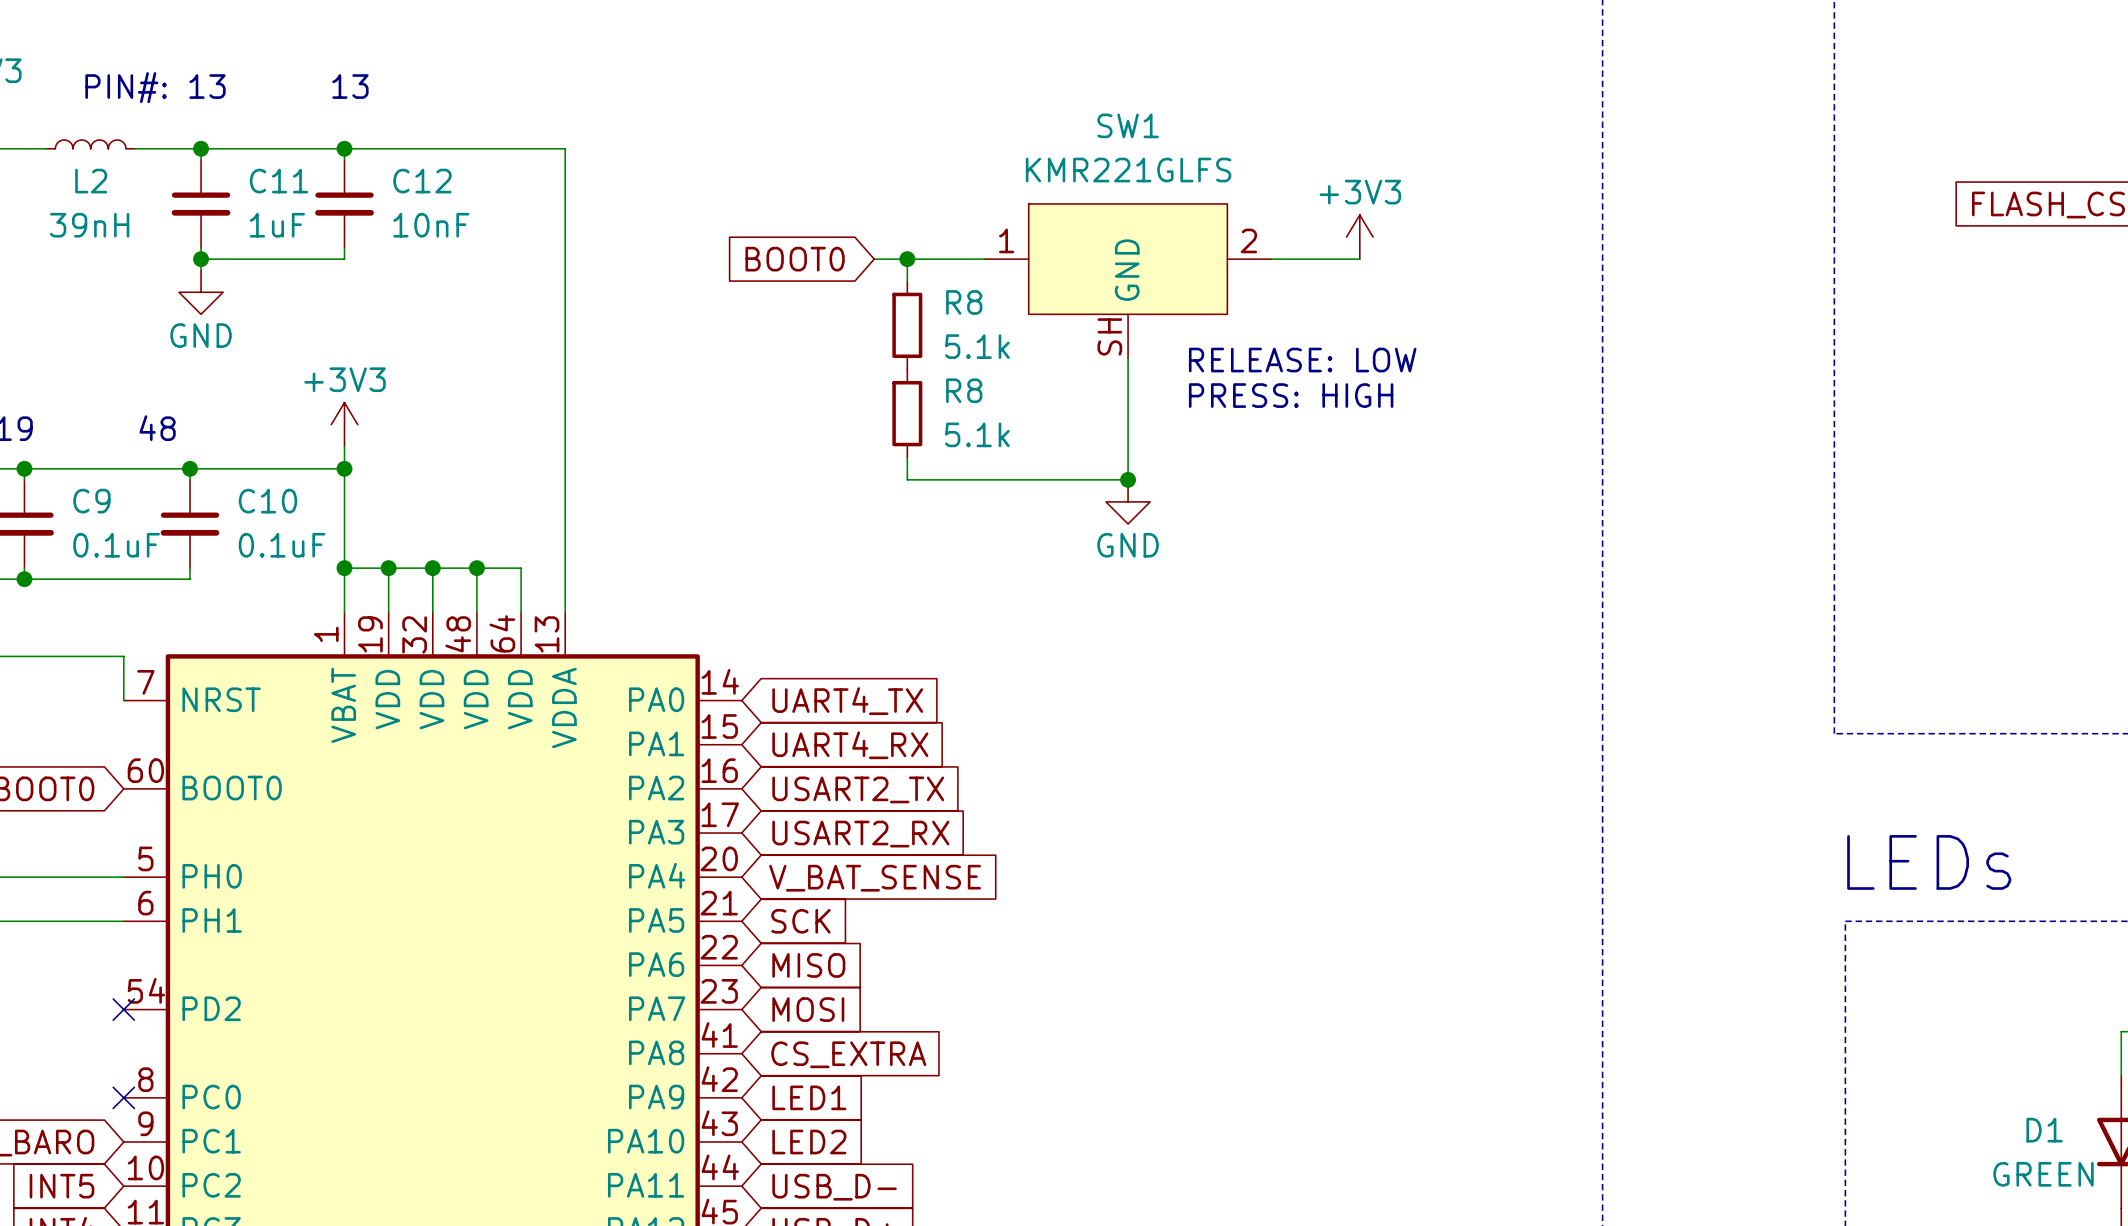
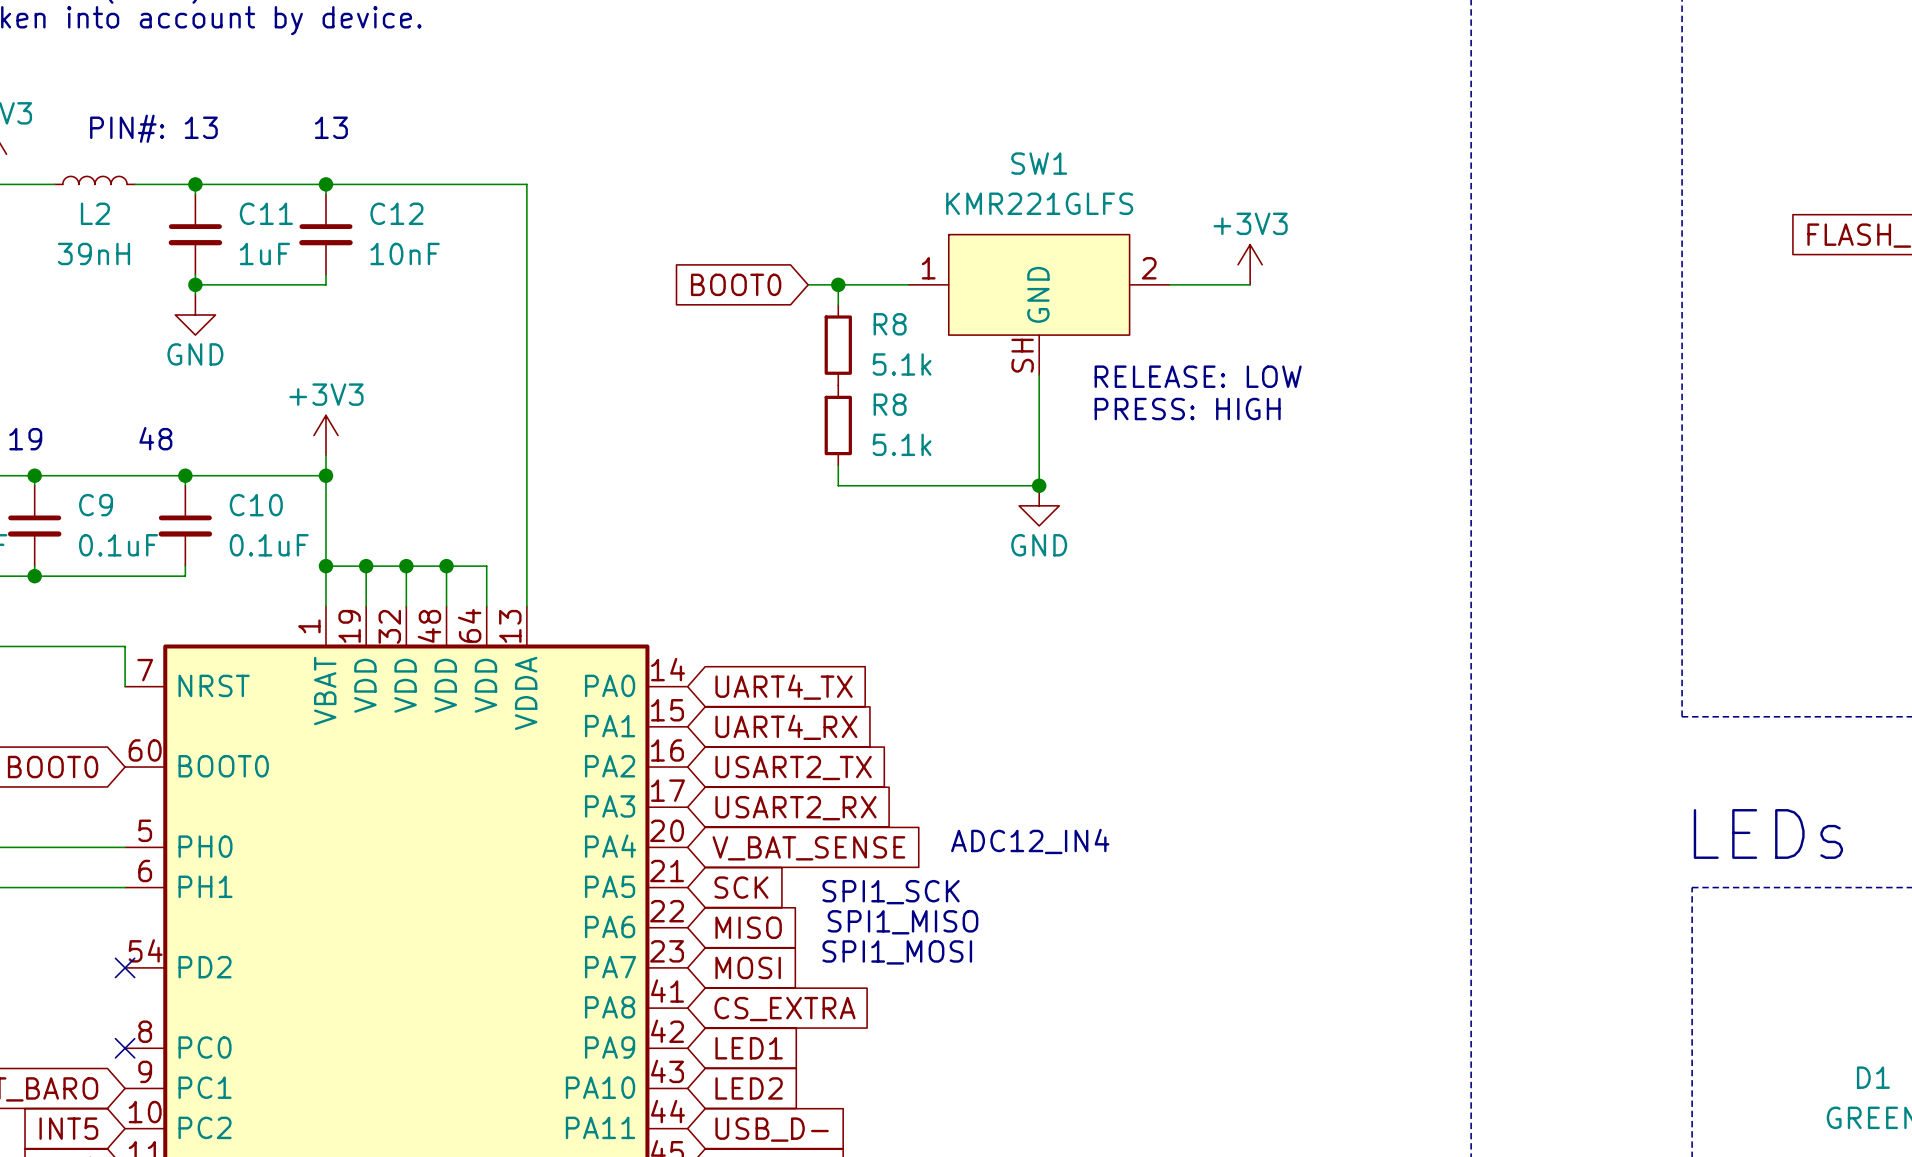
text: none -> ADC12_IN4 (1030, 841)
text: none -> SPI1_SCK (891, 892)
text: none -> SPI1_MISO (903, 922)
text: none -> SPI1_MOSI (897, 952)

